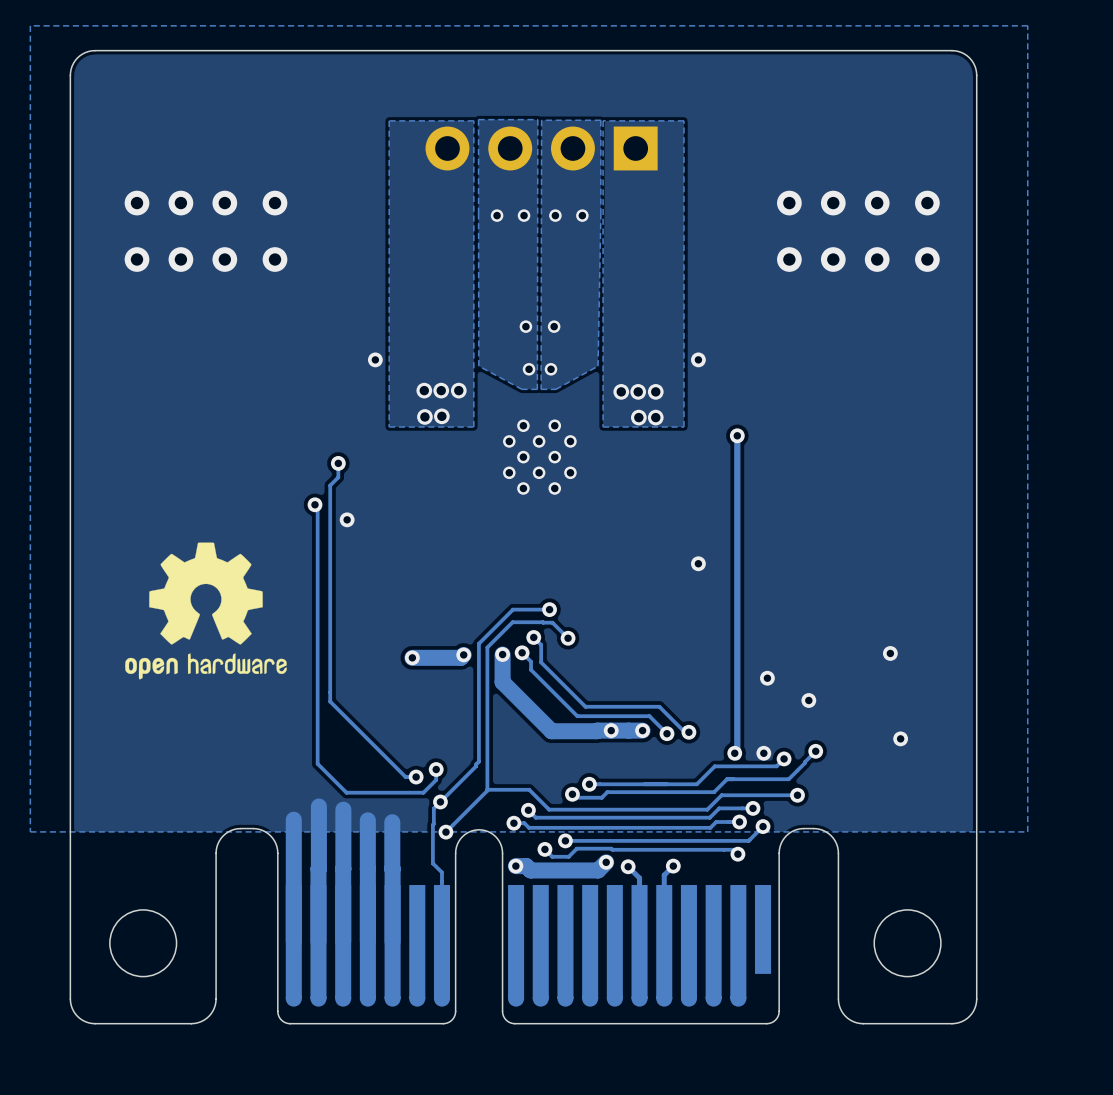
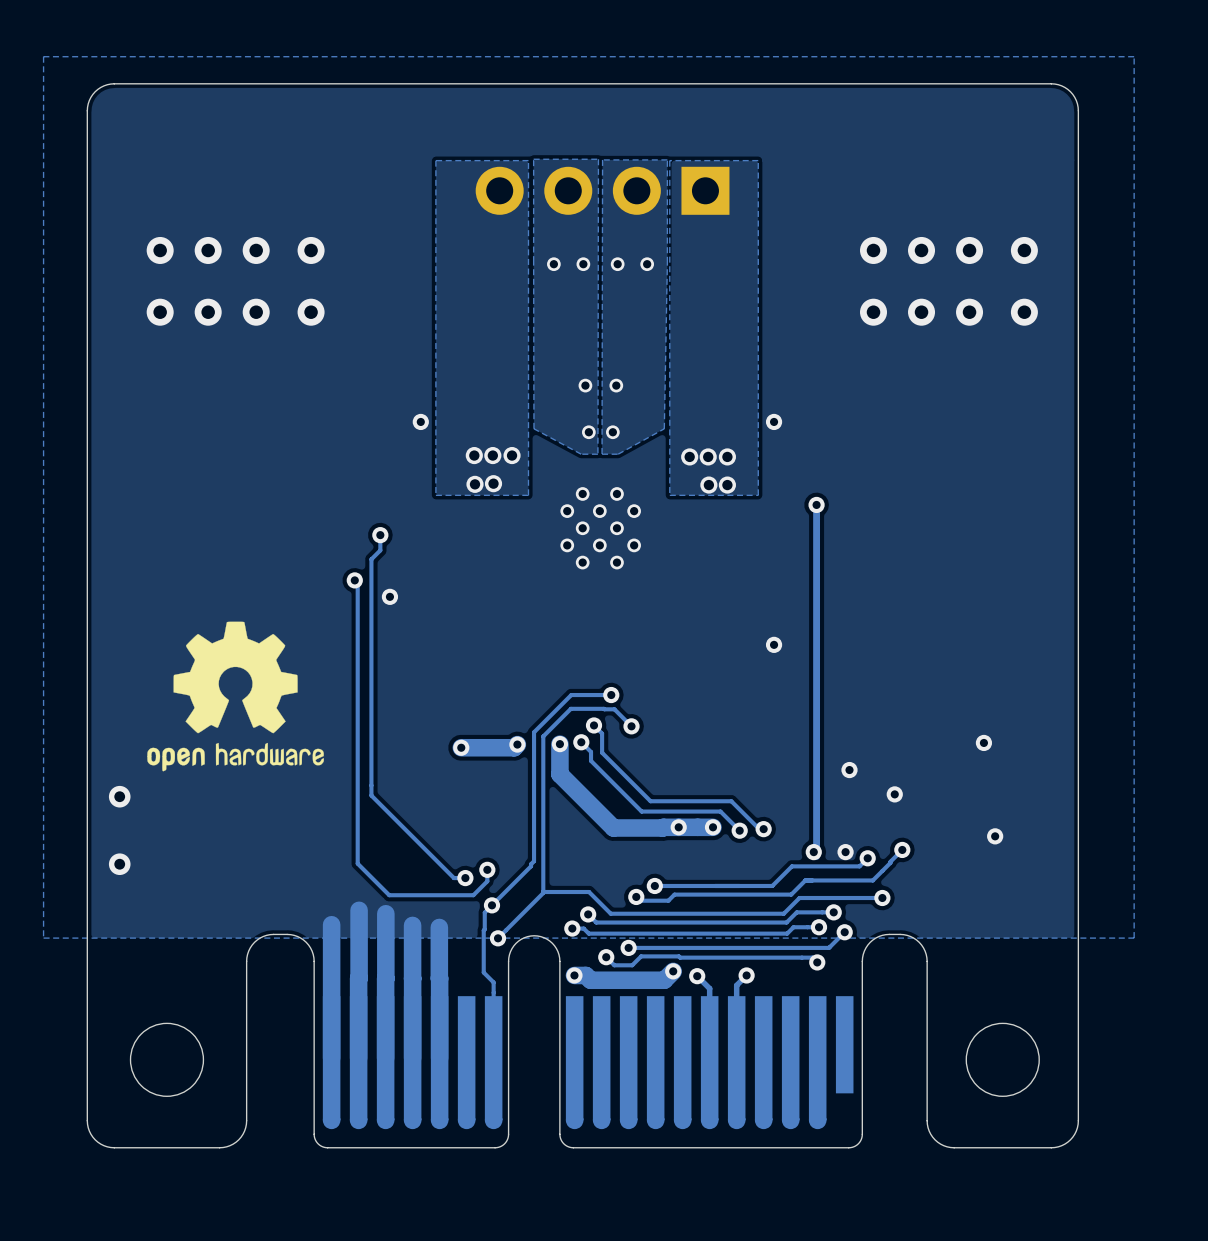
via: none -> (119, 796)
via: none -> (119, 864)

